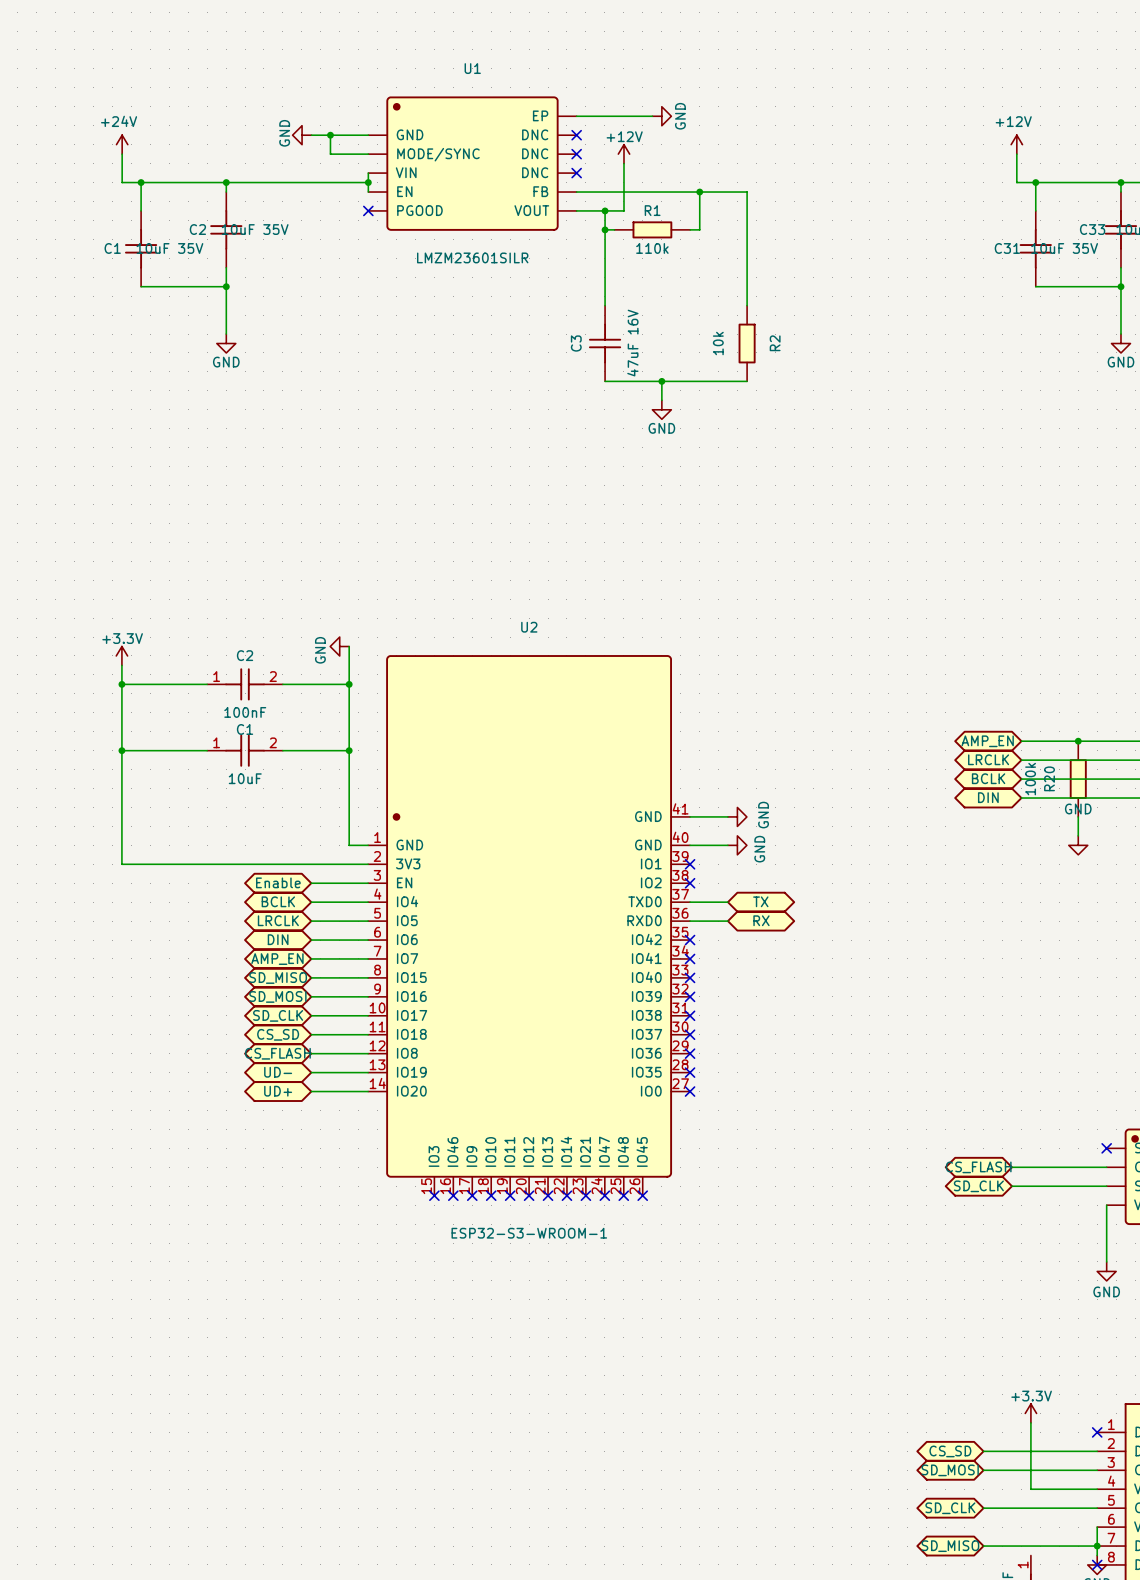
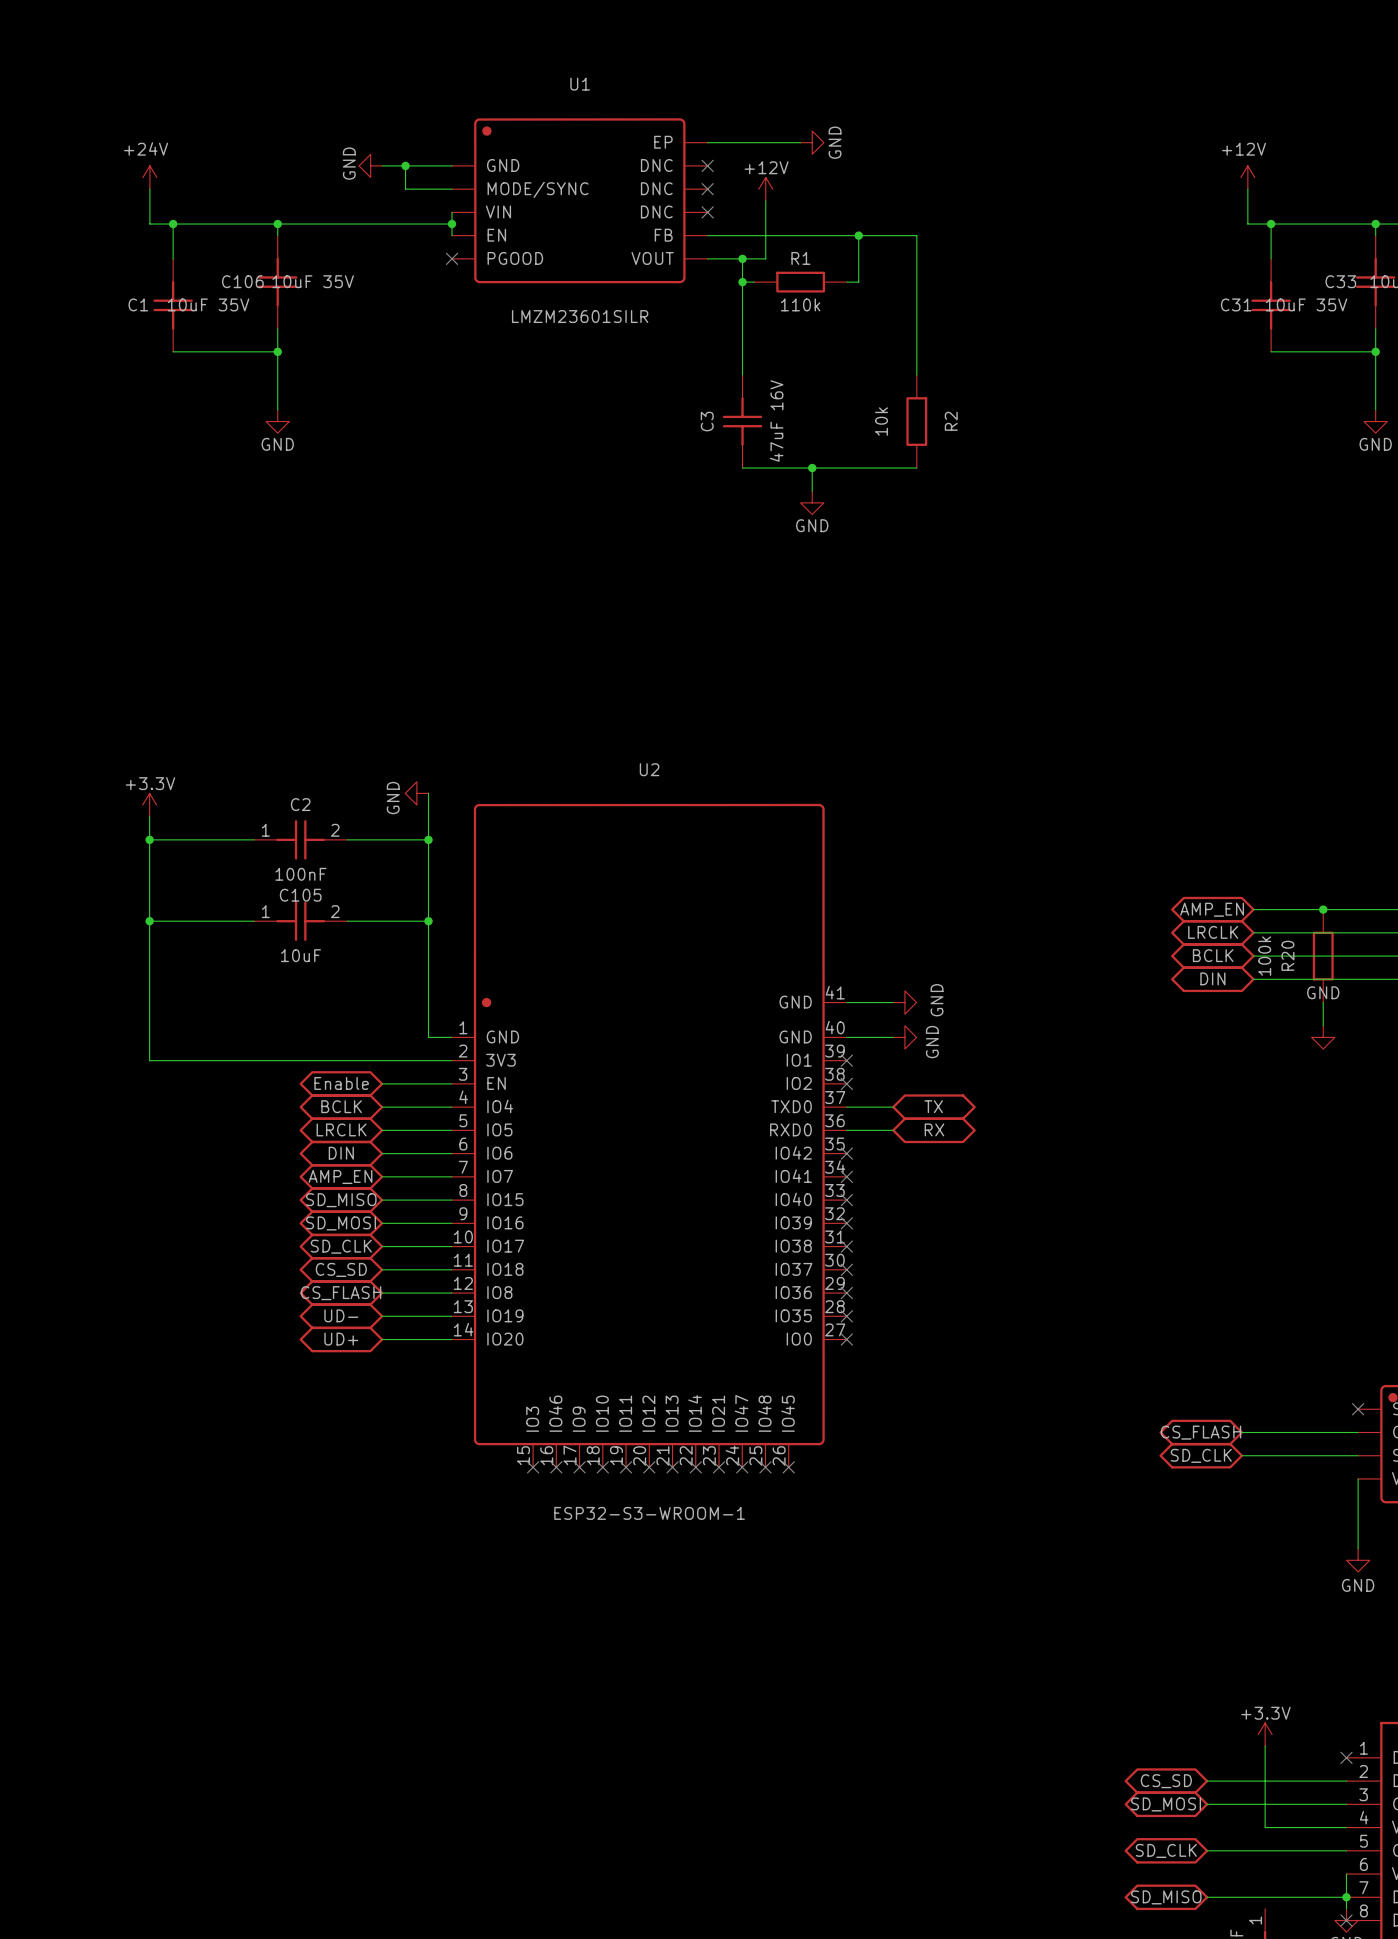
C2 name: C2 (197, 229) -> C106 (242, 281)
C1 name: C1 (245, 729) -> C105 (300, 895)

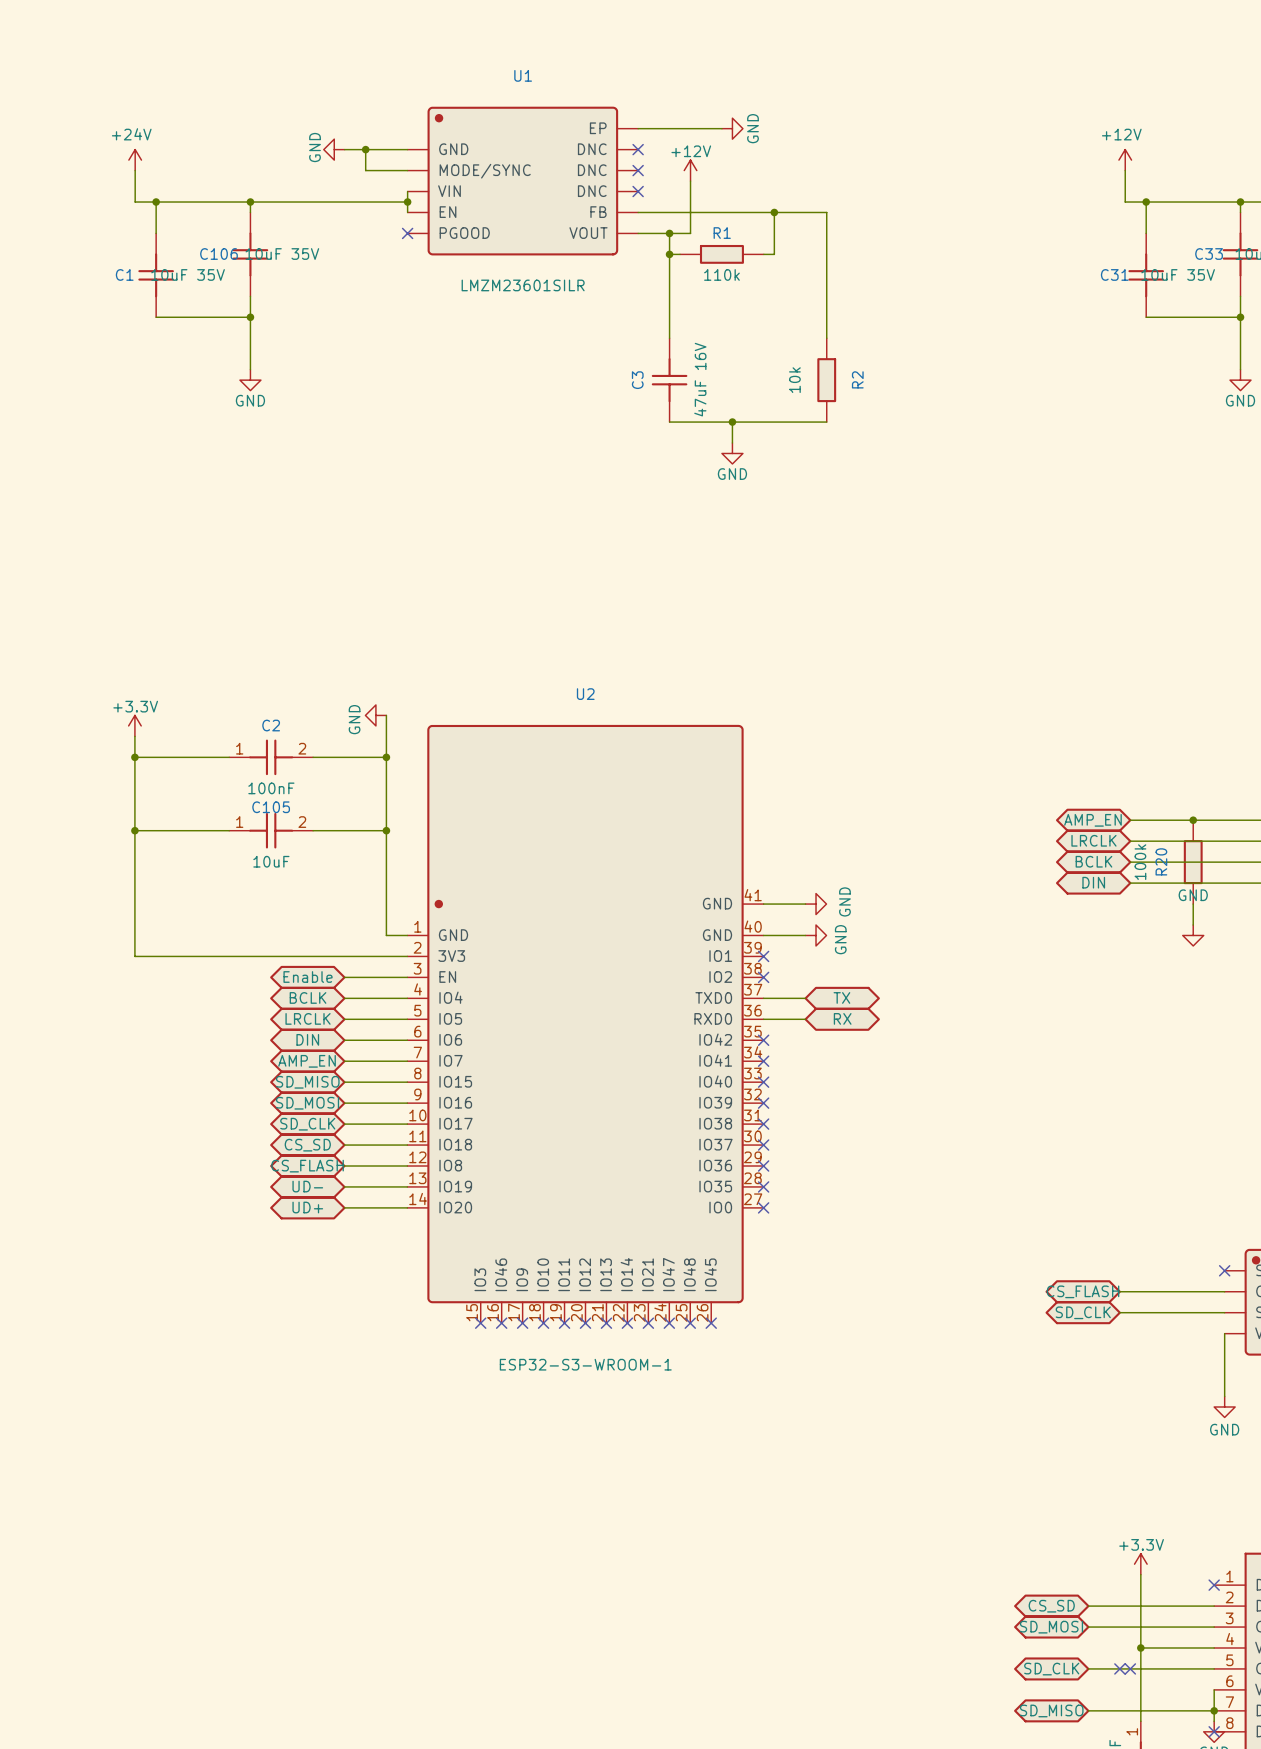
wire: none -> (1140, 1647) (1140, 1721)
junction: none -> (1140, 1647)
no-connect mark: none -> (1119, 1668)
no-connect mark: none -> (1130, 1668)

